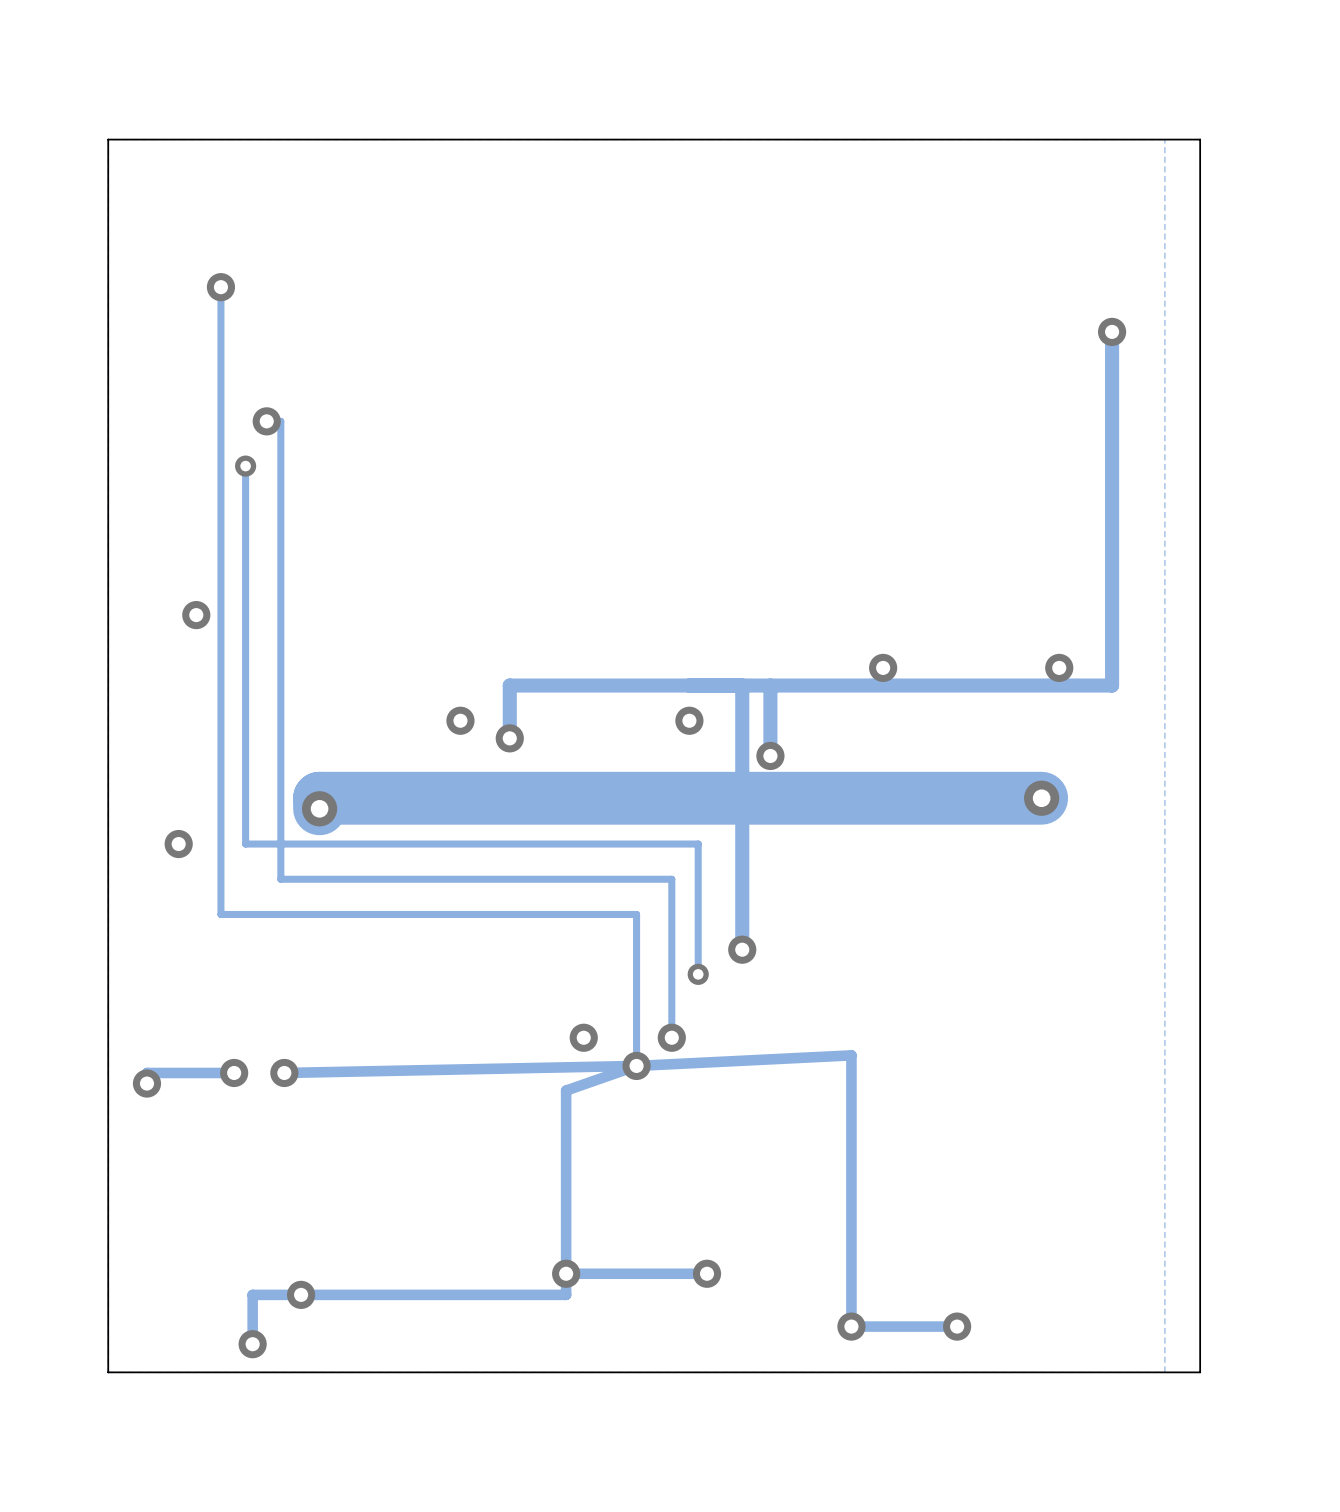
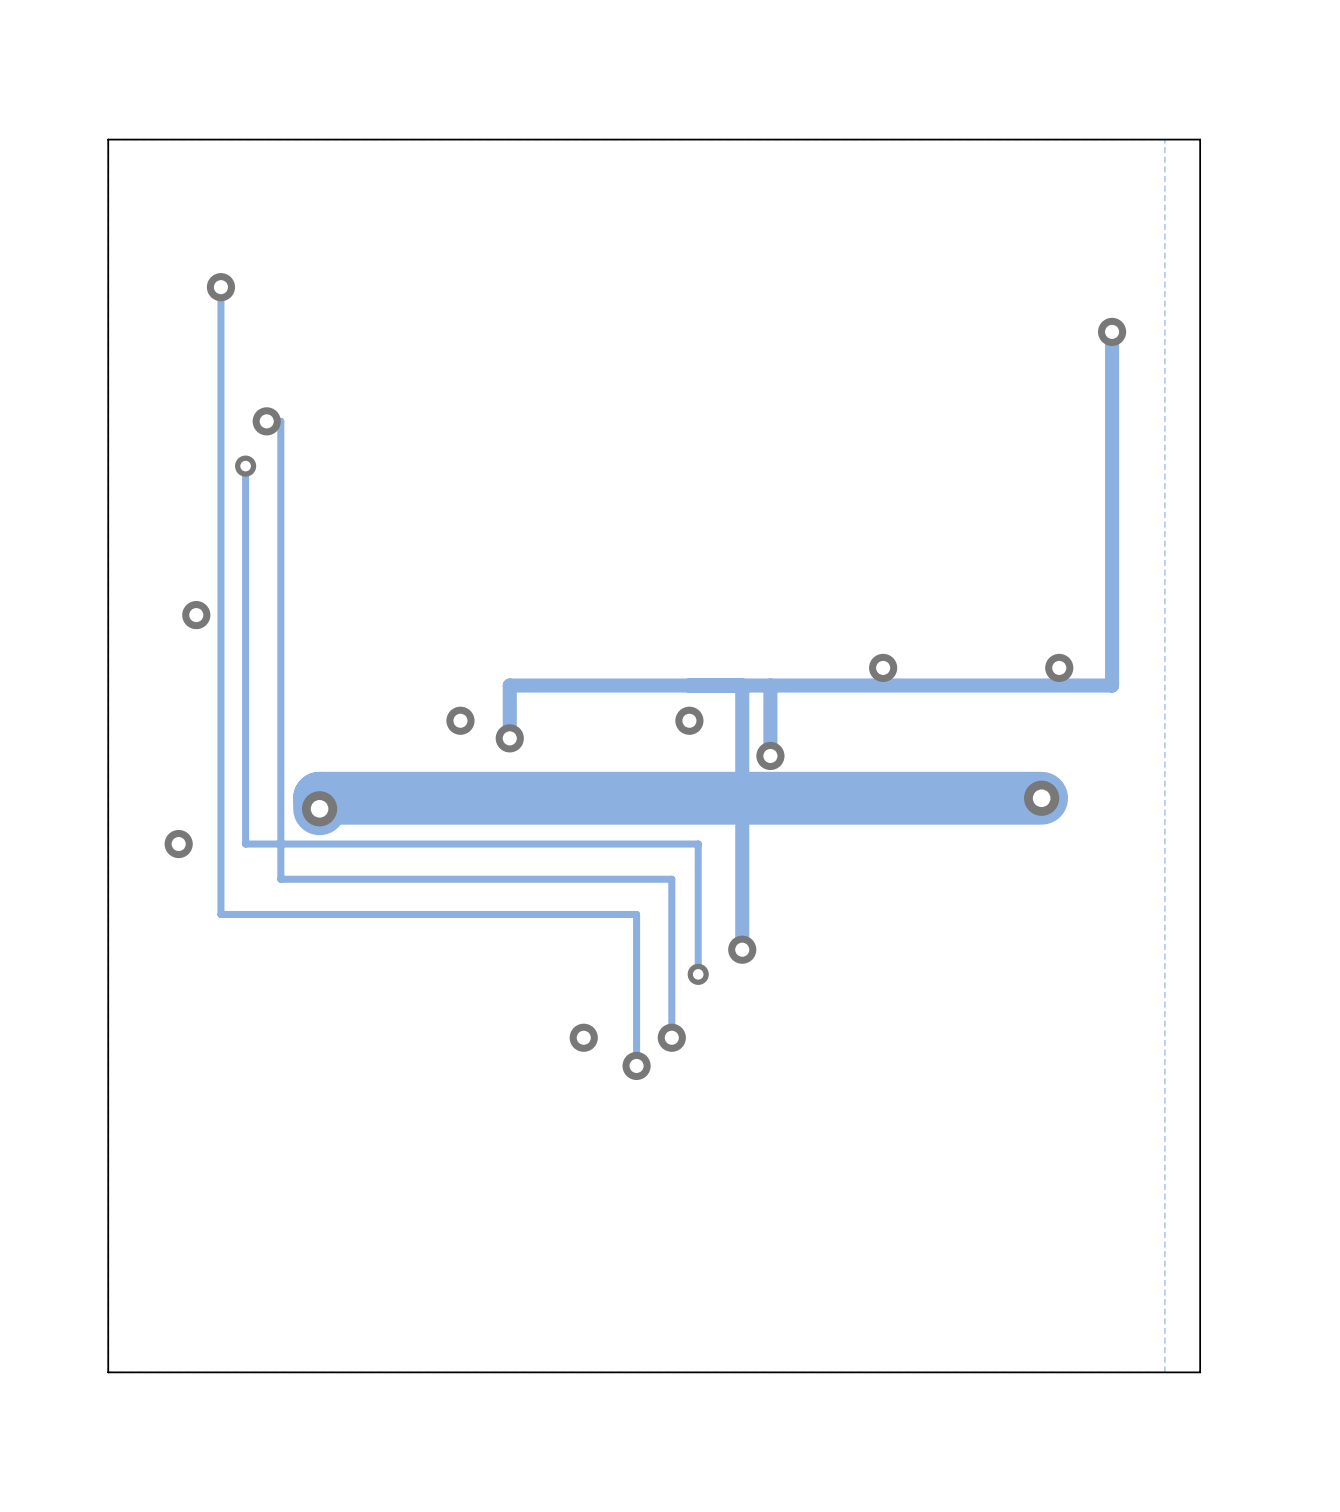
track: (636, 1065) (284, 1072) -> none
track: (636, 1065) (851, 1055) (851, 1326) (957, 1326) -> none
track: (636, 1065) (566, 1090) (566, 1294) (252, 1294) (252, 1344) -> none
track: (234, 1072) (146, 1072) (146, 1083) -> none
via: (234, 1072) -> none
via: (284, 1072) -> none
via: (146, 1083) -> none
via: (566, 1273) -> none
track: (707, 1273) (566, 1273) -> none
via: (707, 1273) -> none
via: (301, 1294) -> none
via: (851, 1326) -> none
via: (957, 1326) -> none
via: (252, 1344) -> none

